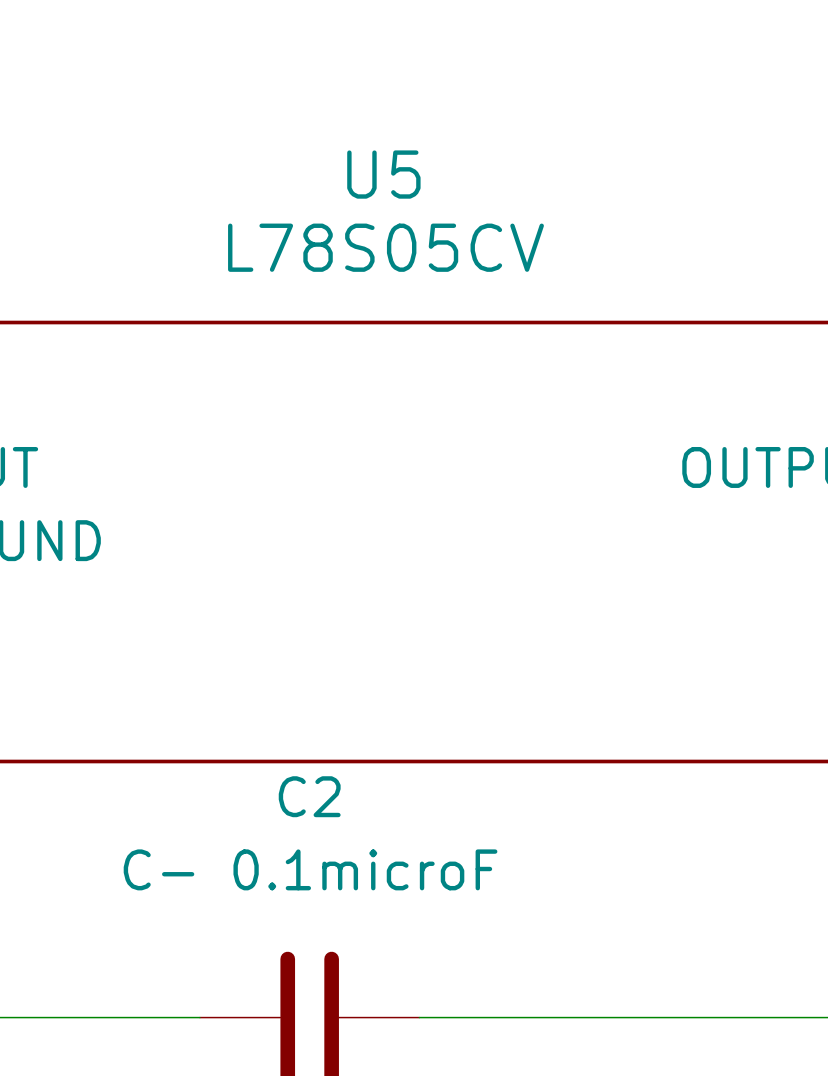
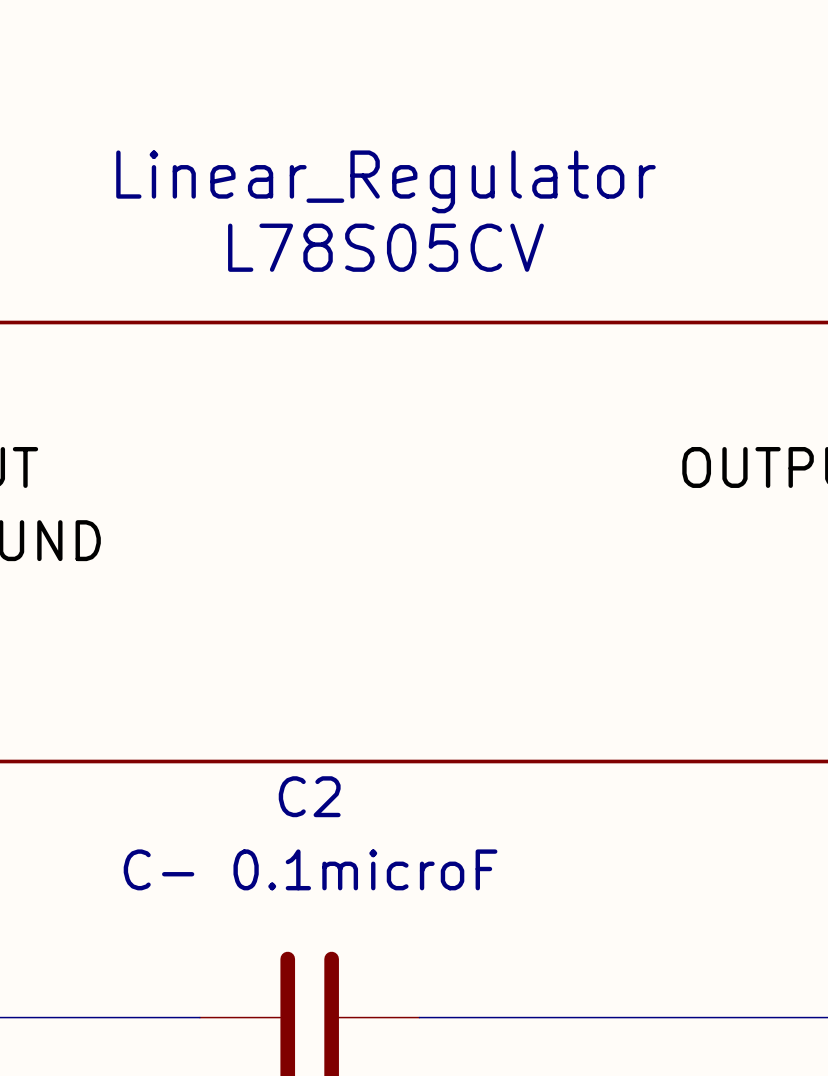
U5 name: U5 (383, 174) -> Linear_Regulator (385, 181)

